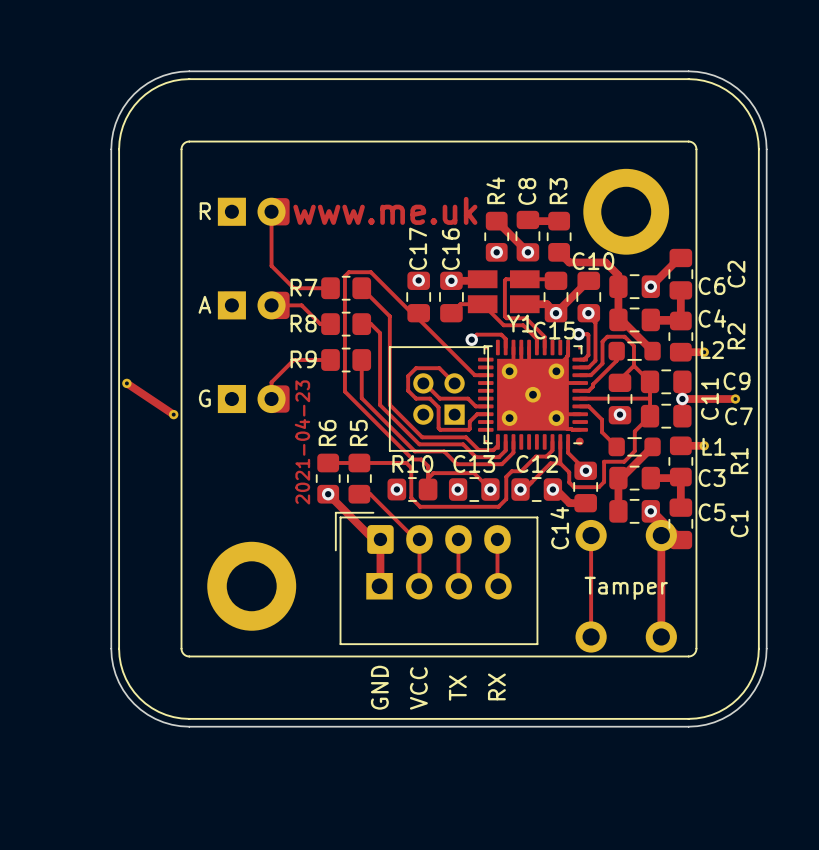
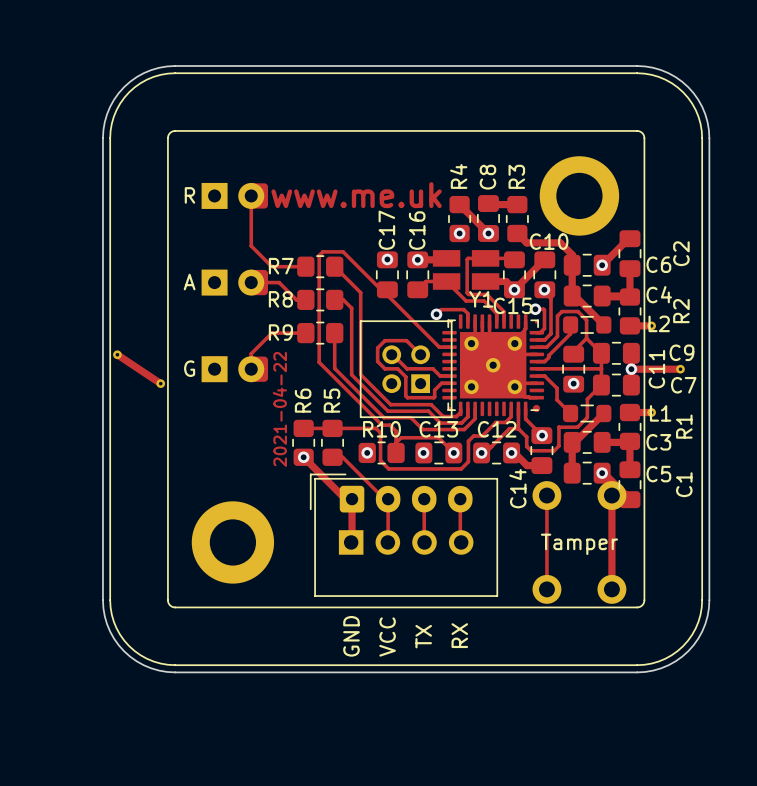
text: 2021-04-23 (302, 442) -> 2021-04-22 (279, 409)

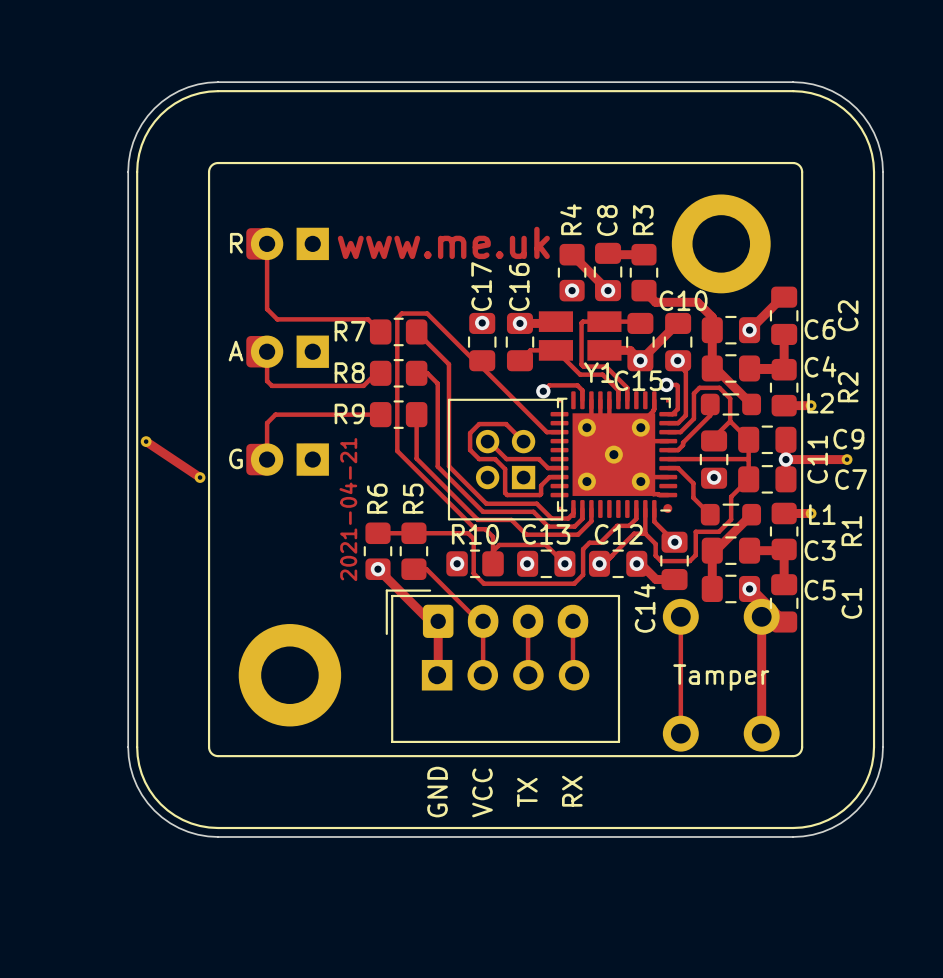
part rotation: 0° (234, 195) -> 180° (287, 243)
track: (251, 195) (251, 246) (271, 266) (305, 266) -> (267, 243) (267, 309) (277, 319) (368, 319) (380, 331)
part rotation: 0° (234, 282) -> 180° (287, 351)
track: (251, 282) (279, 282) (296, 299) (302, 299) -> (267, 351) (267, 381) (271, 385) (363, 385) (376, 373)
track: (271, 333) (251, 353) (251, 369) -> (338, 414) (275, 414) (267, 423) (267, 459)
part rotation: 0° (234, 369) -> 180° (287, 459)
text: 2021-04-22 (279, 409) -> 2021-04-21 (348, 509)

